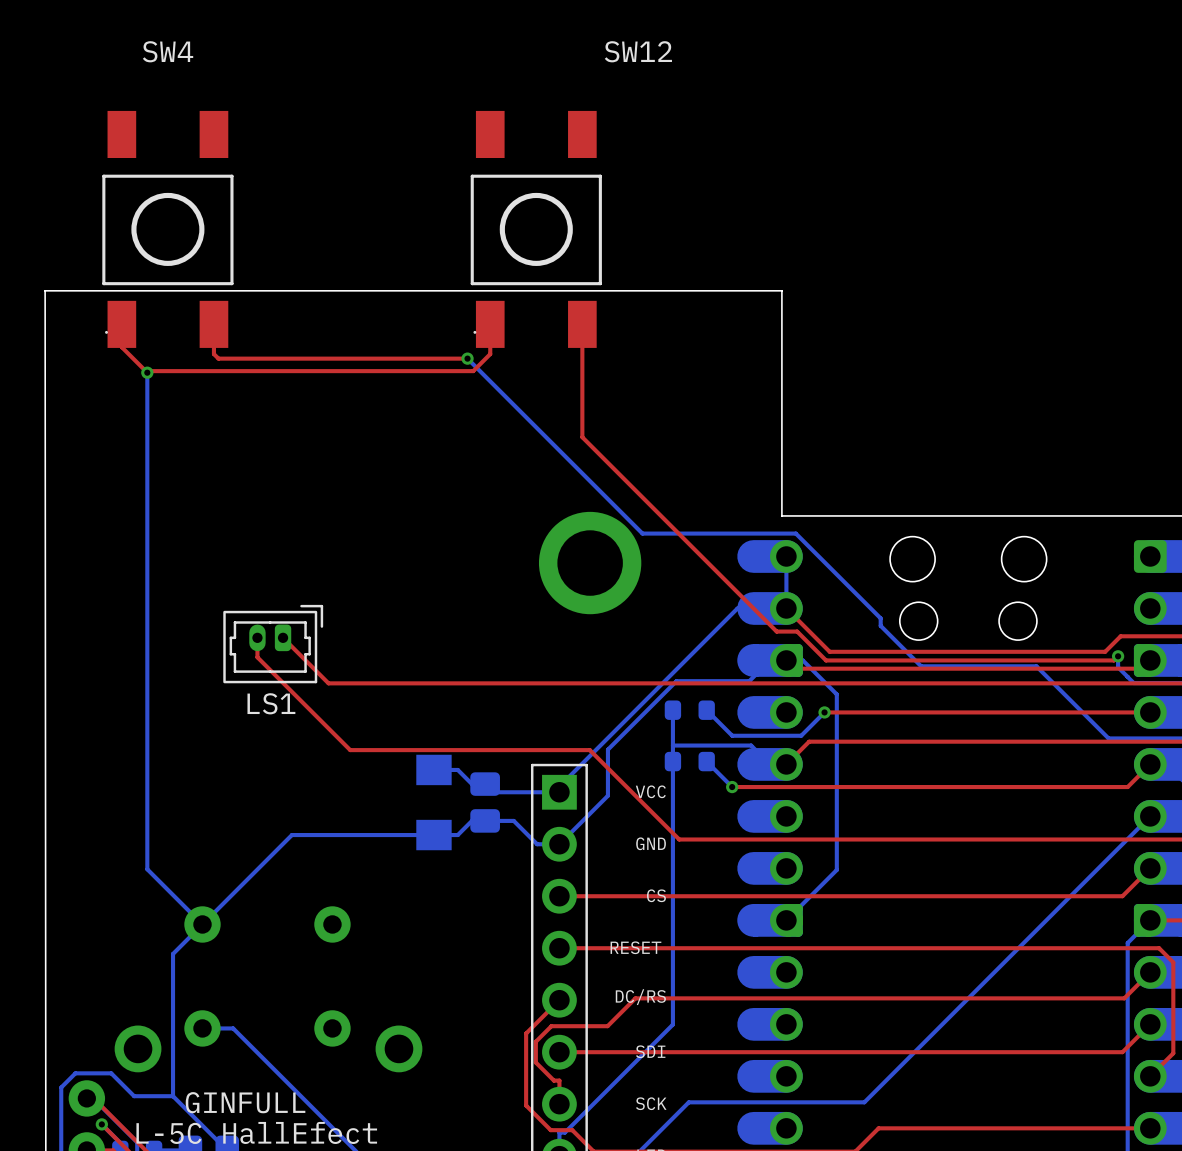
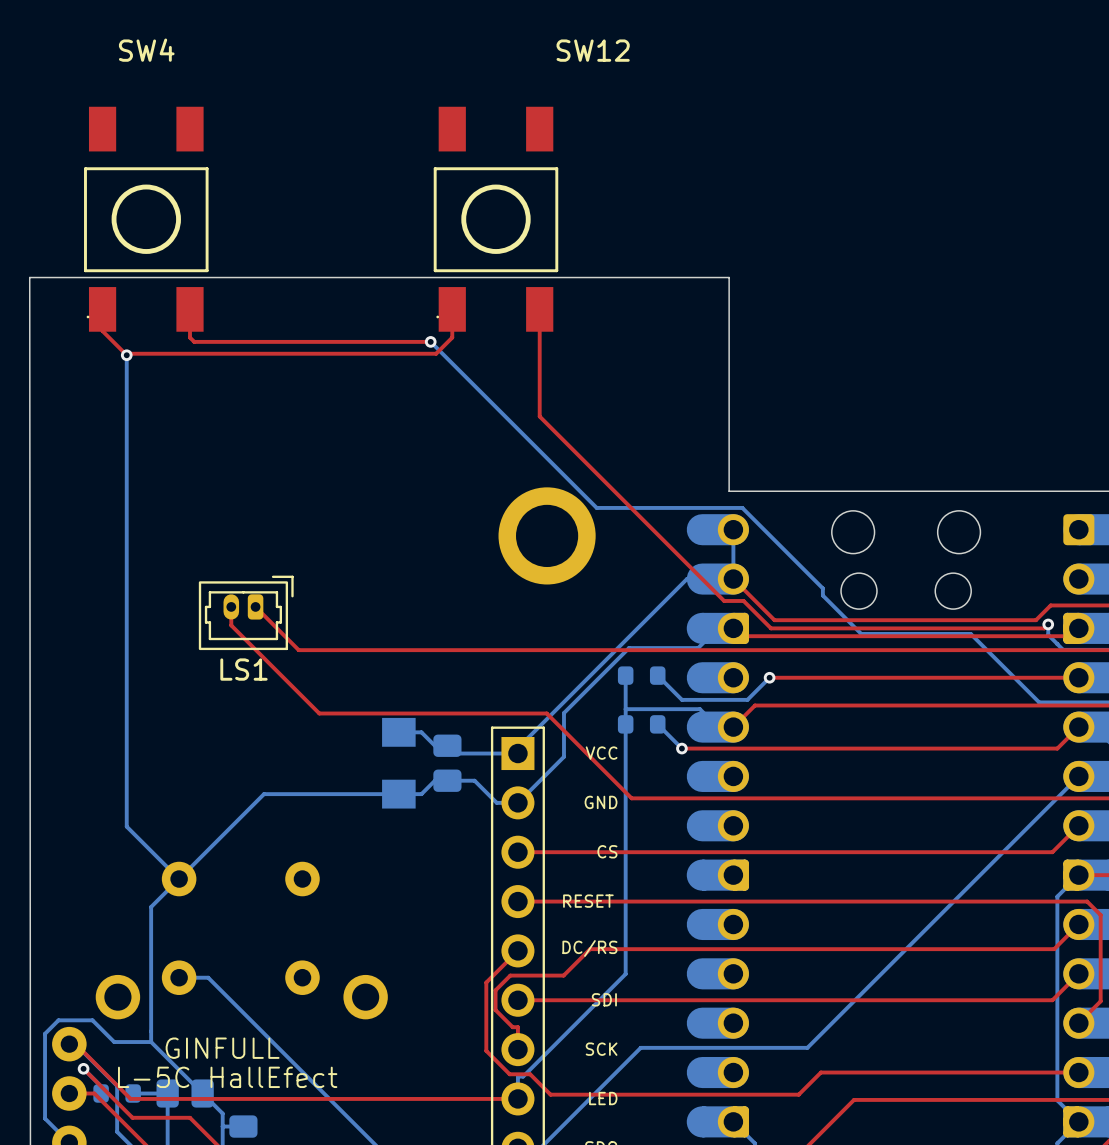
bottom track: (786, 660) (802, 660) (836, 694) (836, 869) (786, 920) -> none

